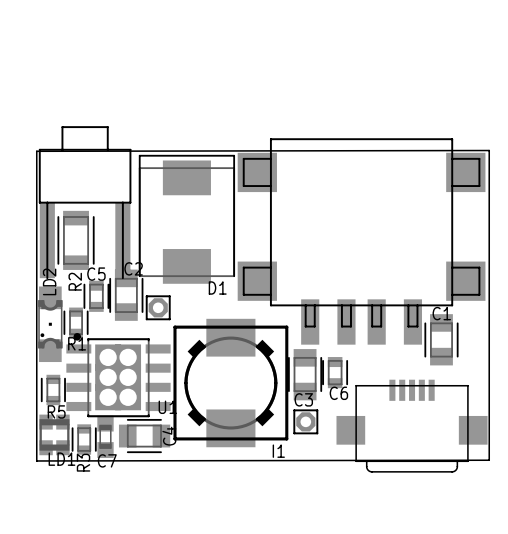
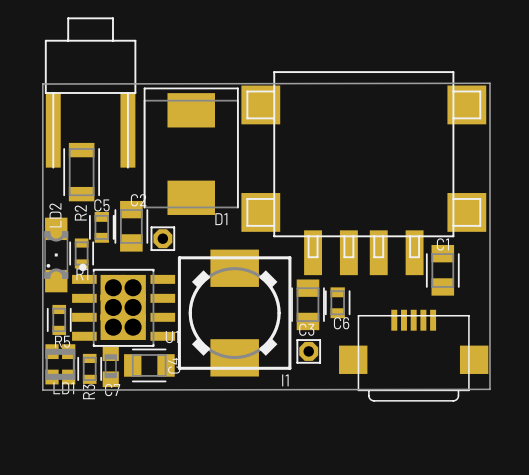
part position: (85, 202) -> (90, 92)

